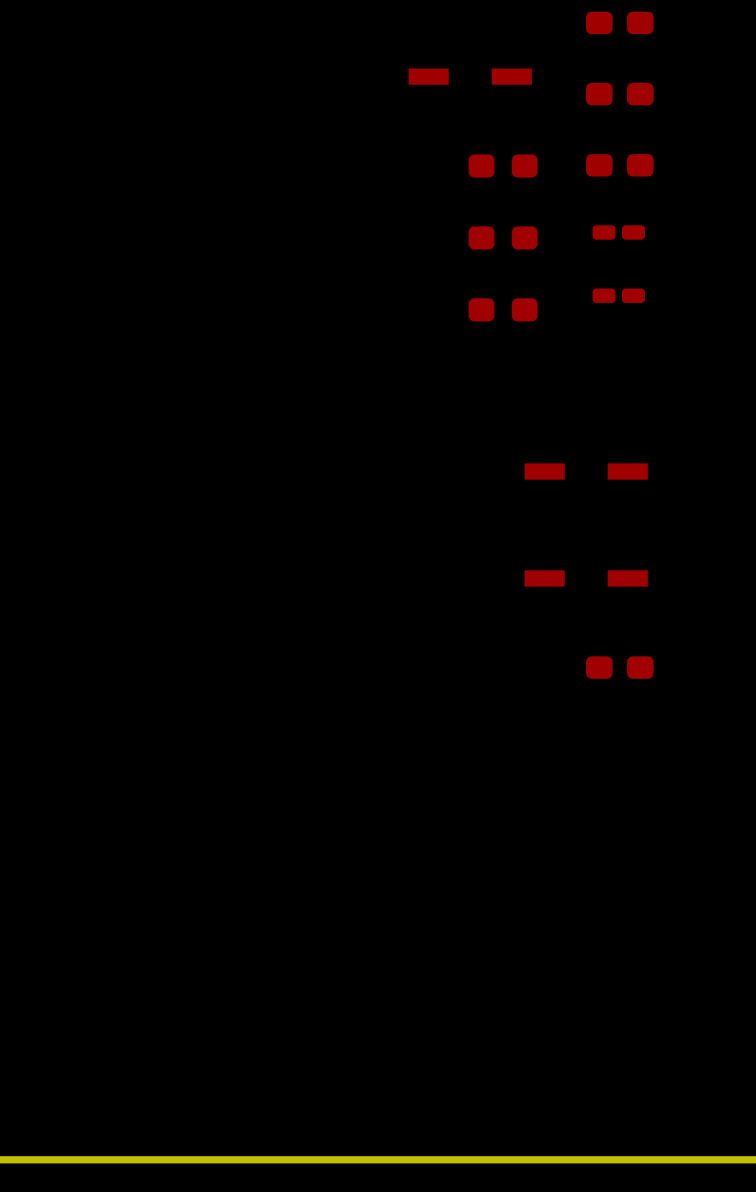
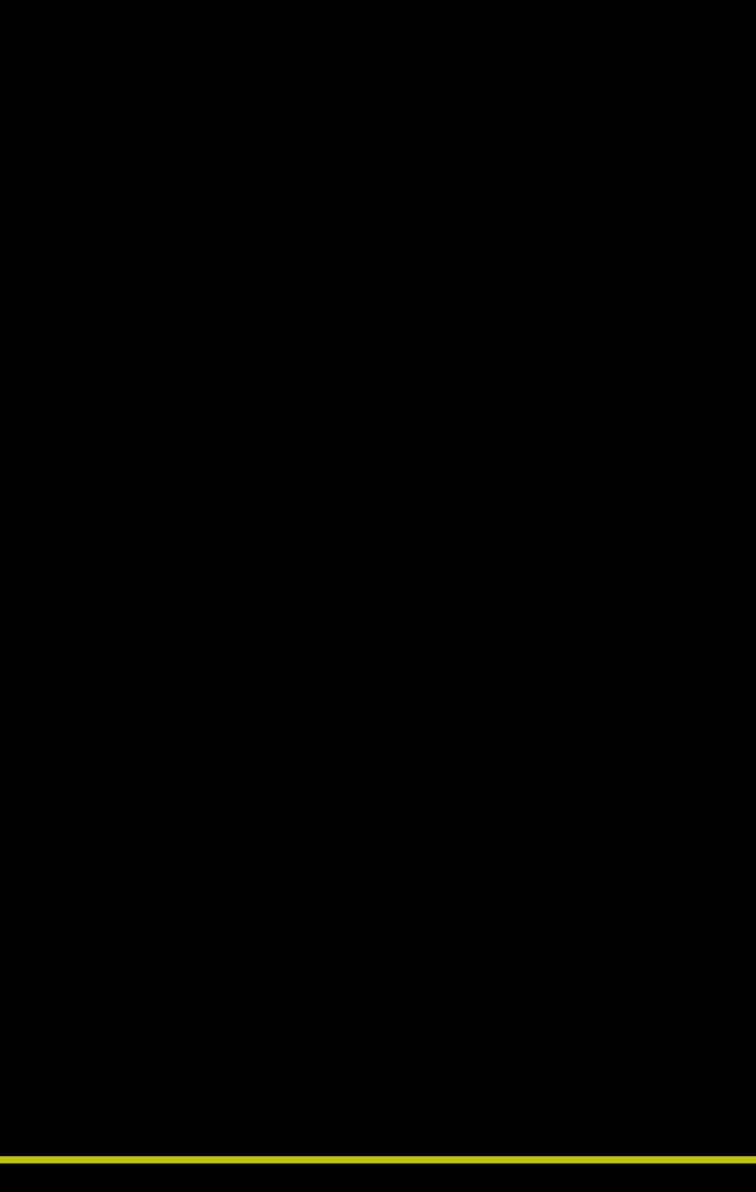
part: (619, 22) -> none
part: (470, 76) -> none
part: (619, 94) -> none
part: (619, 165) -> none
part: (503, 166) -> none
part: (618, 232) -> none
part: (503, 237) -> none
part: (618, 295) -> none
part: (503, 309) -> none
part: (586, 471) -> none
part: (586, 578) -> none
part: (619, 667) -> none

